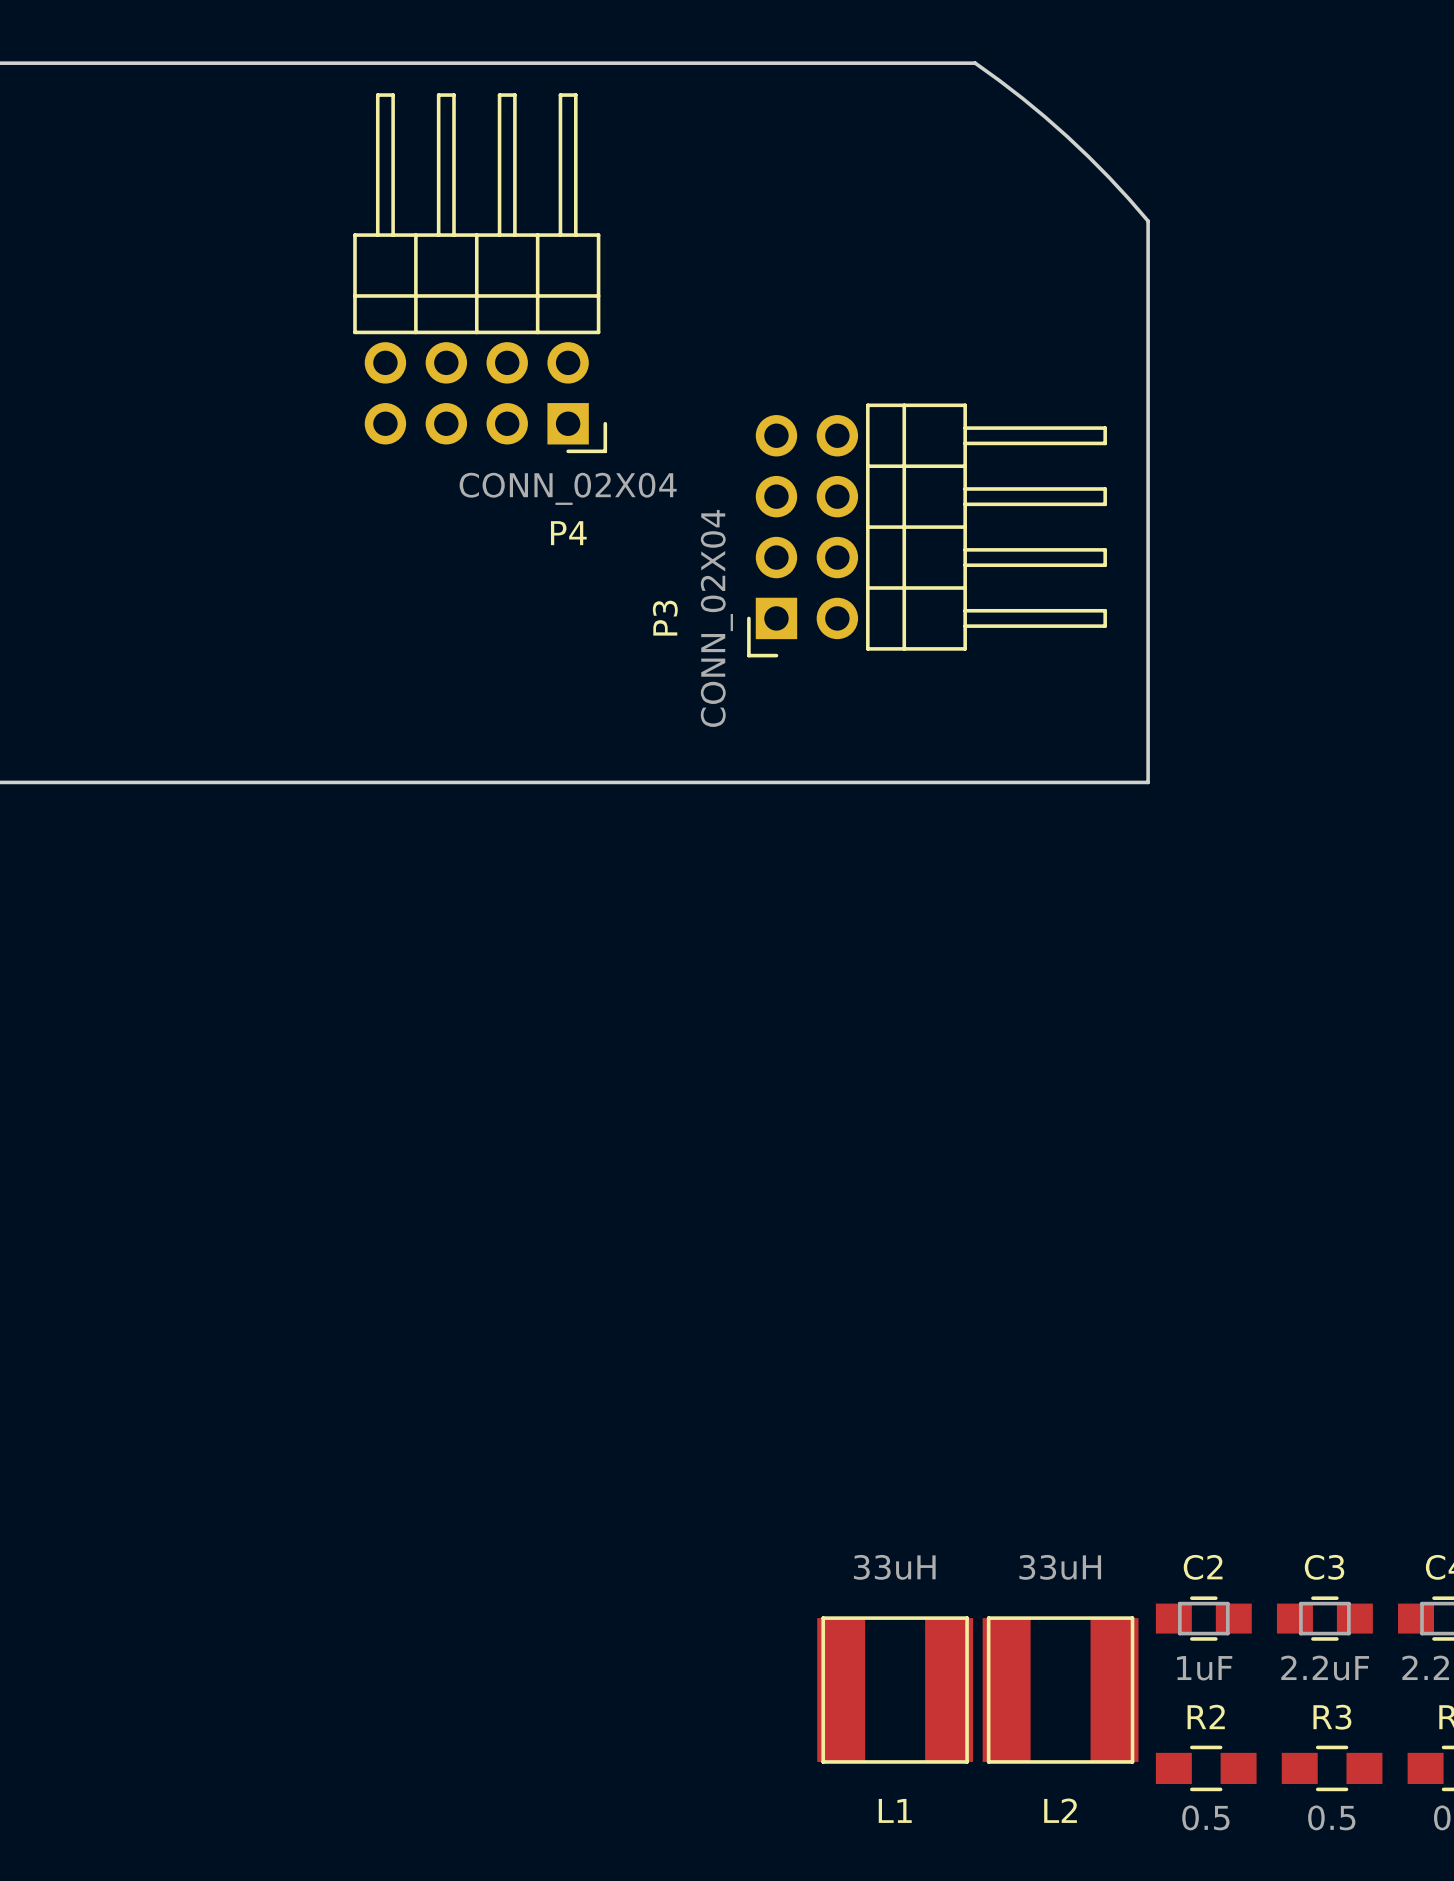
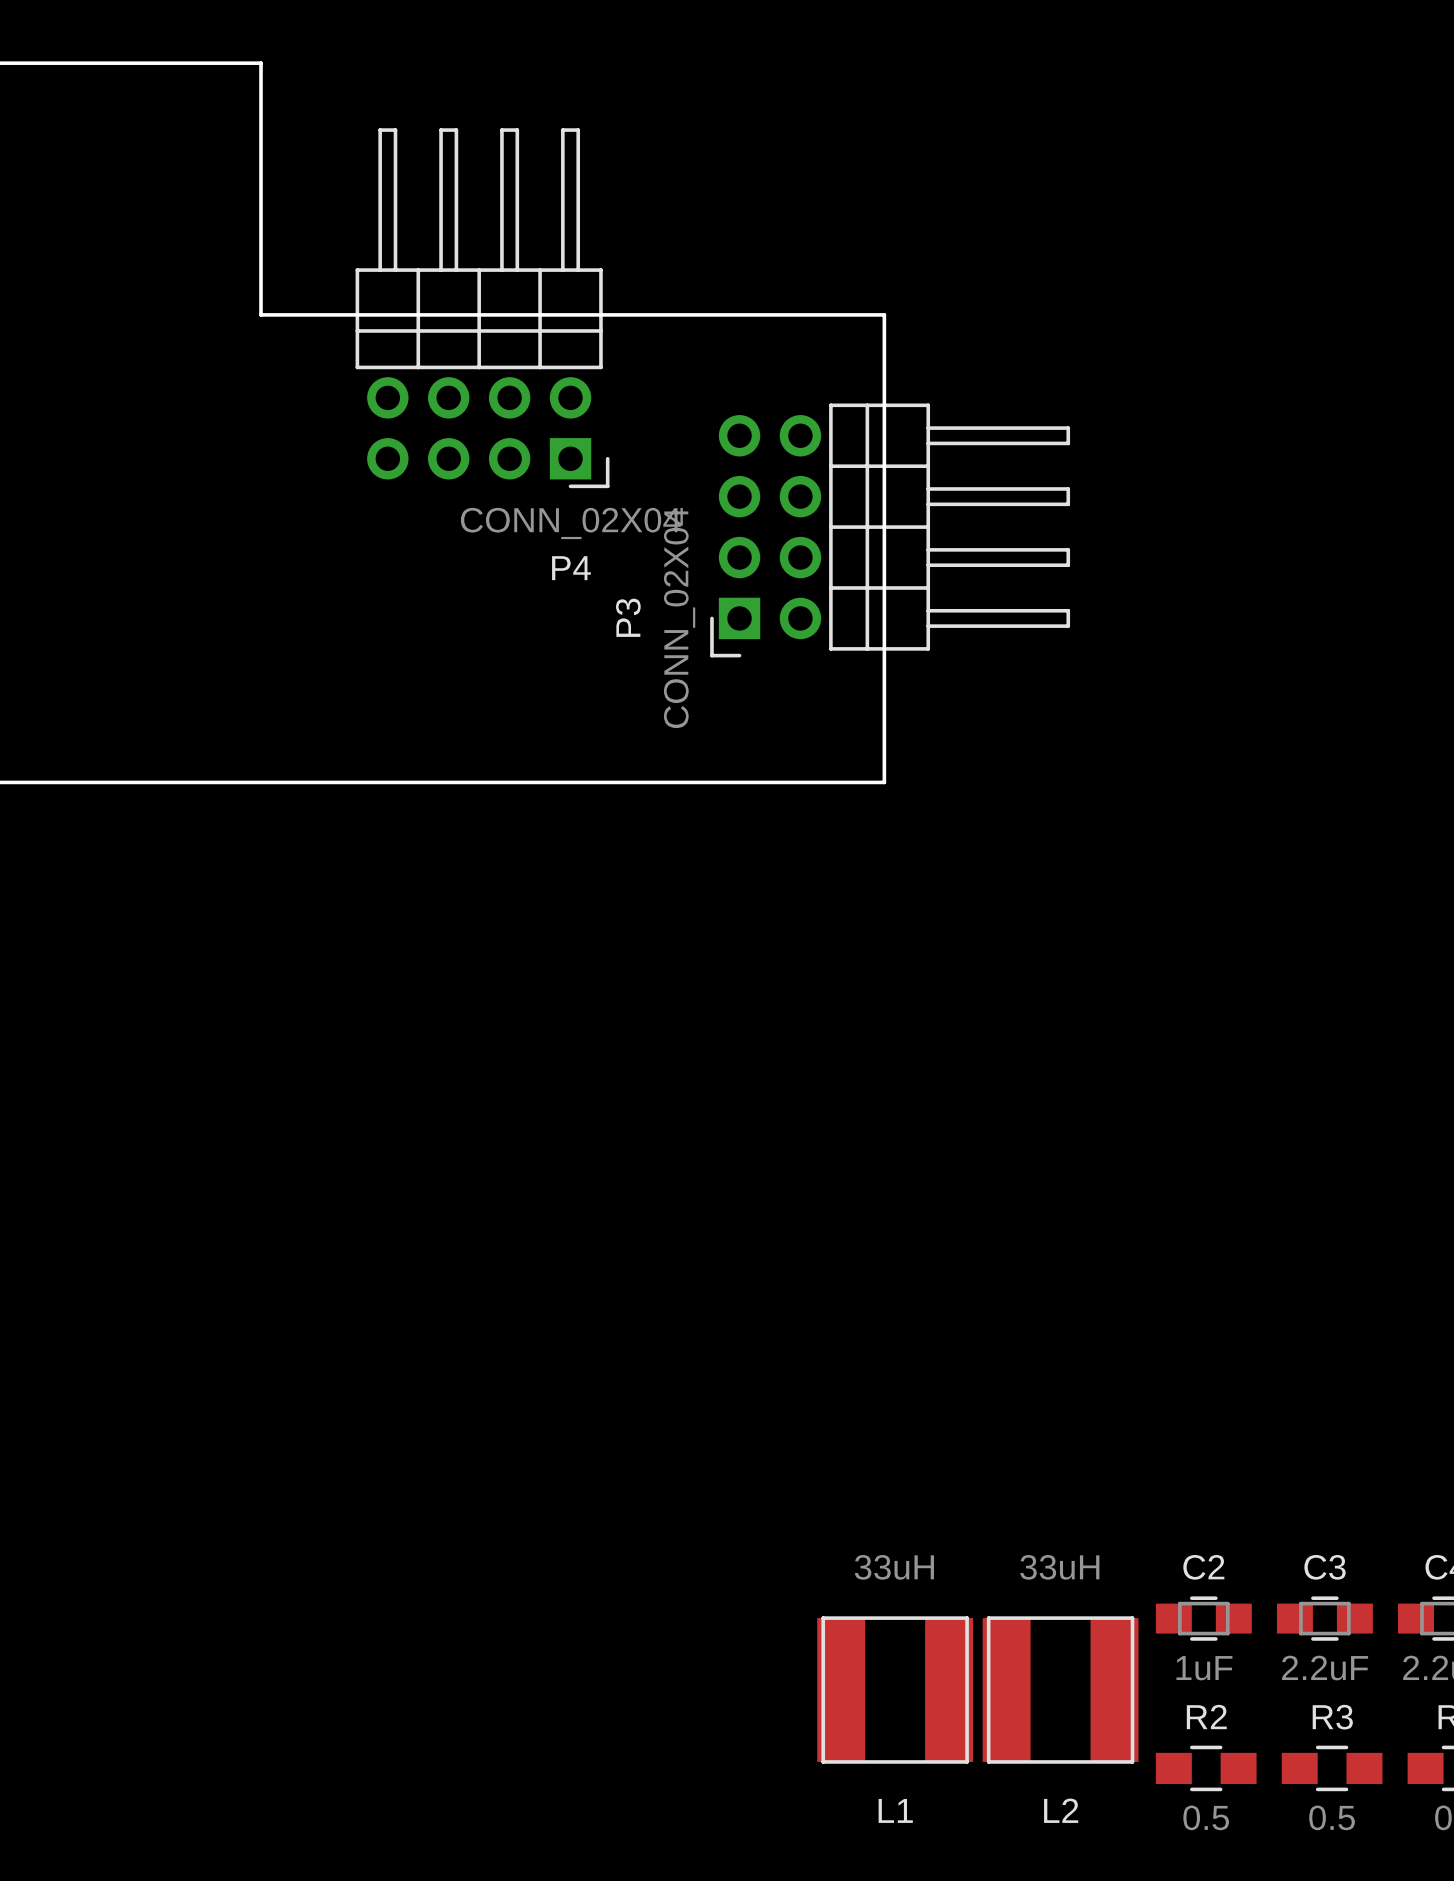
board edge: (260, 63) (975, 63) (1022, 98) (1066, 136) (1128, 198) (1148, 221) (1148, 782) (884, 782) -> (260, 63) (260, 314) (884, 314) (884, 782)
P4 position: (480, 273) -> (482, 308)
P3 position: (927, 530) -> (890, 530)

